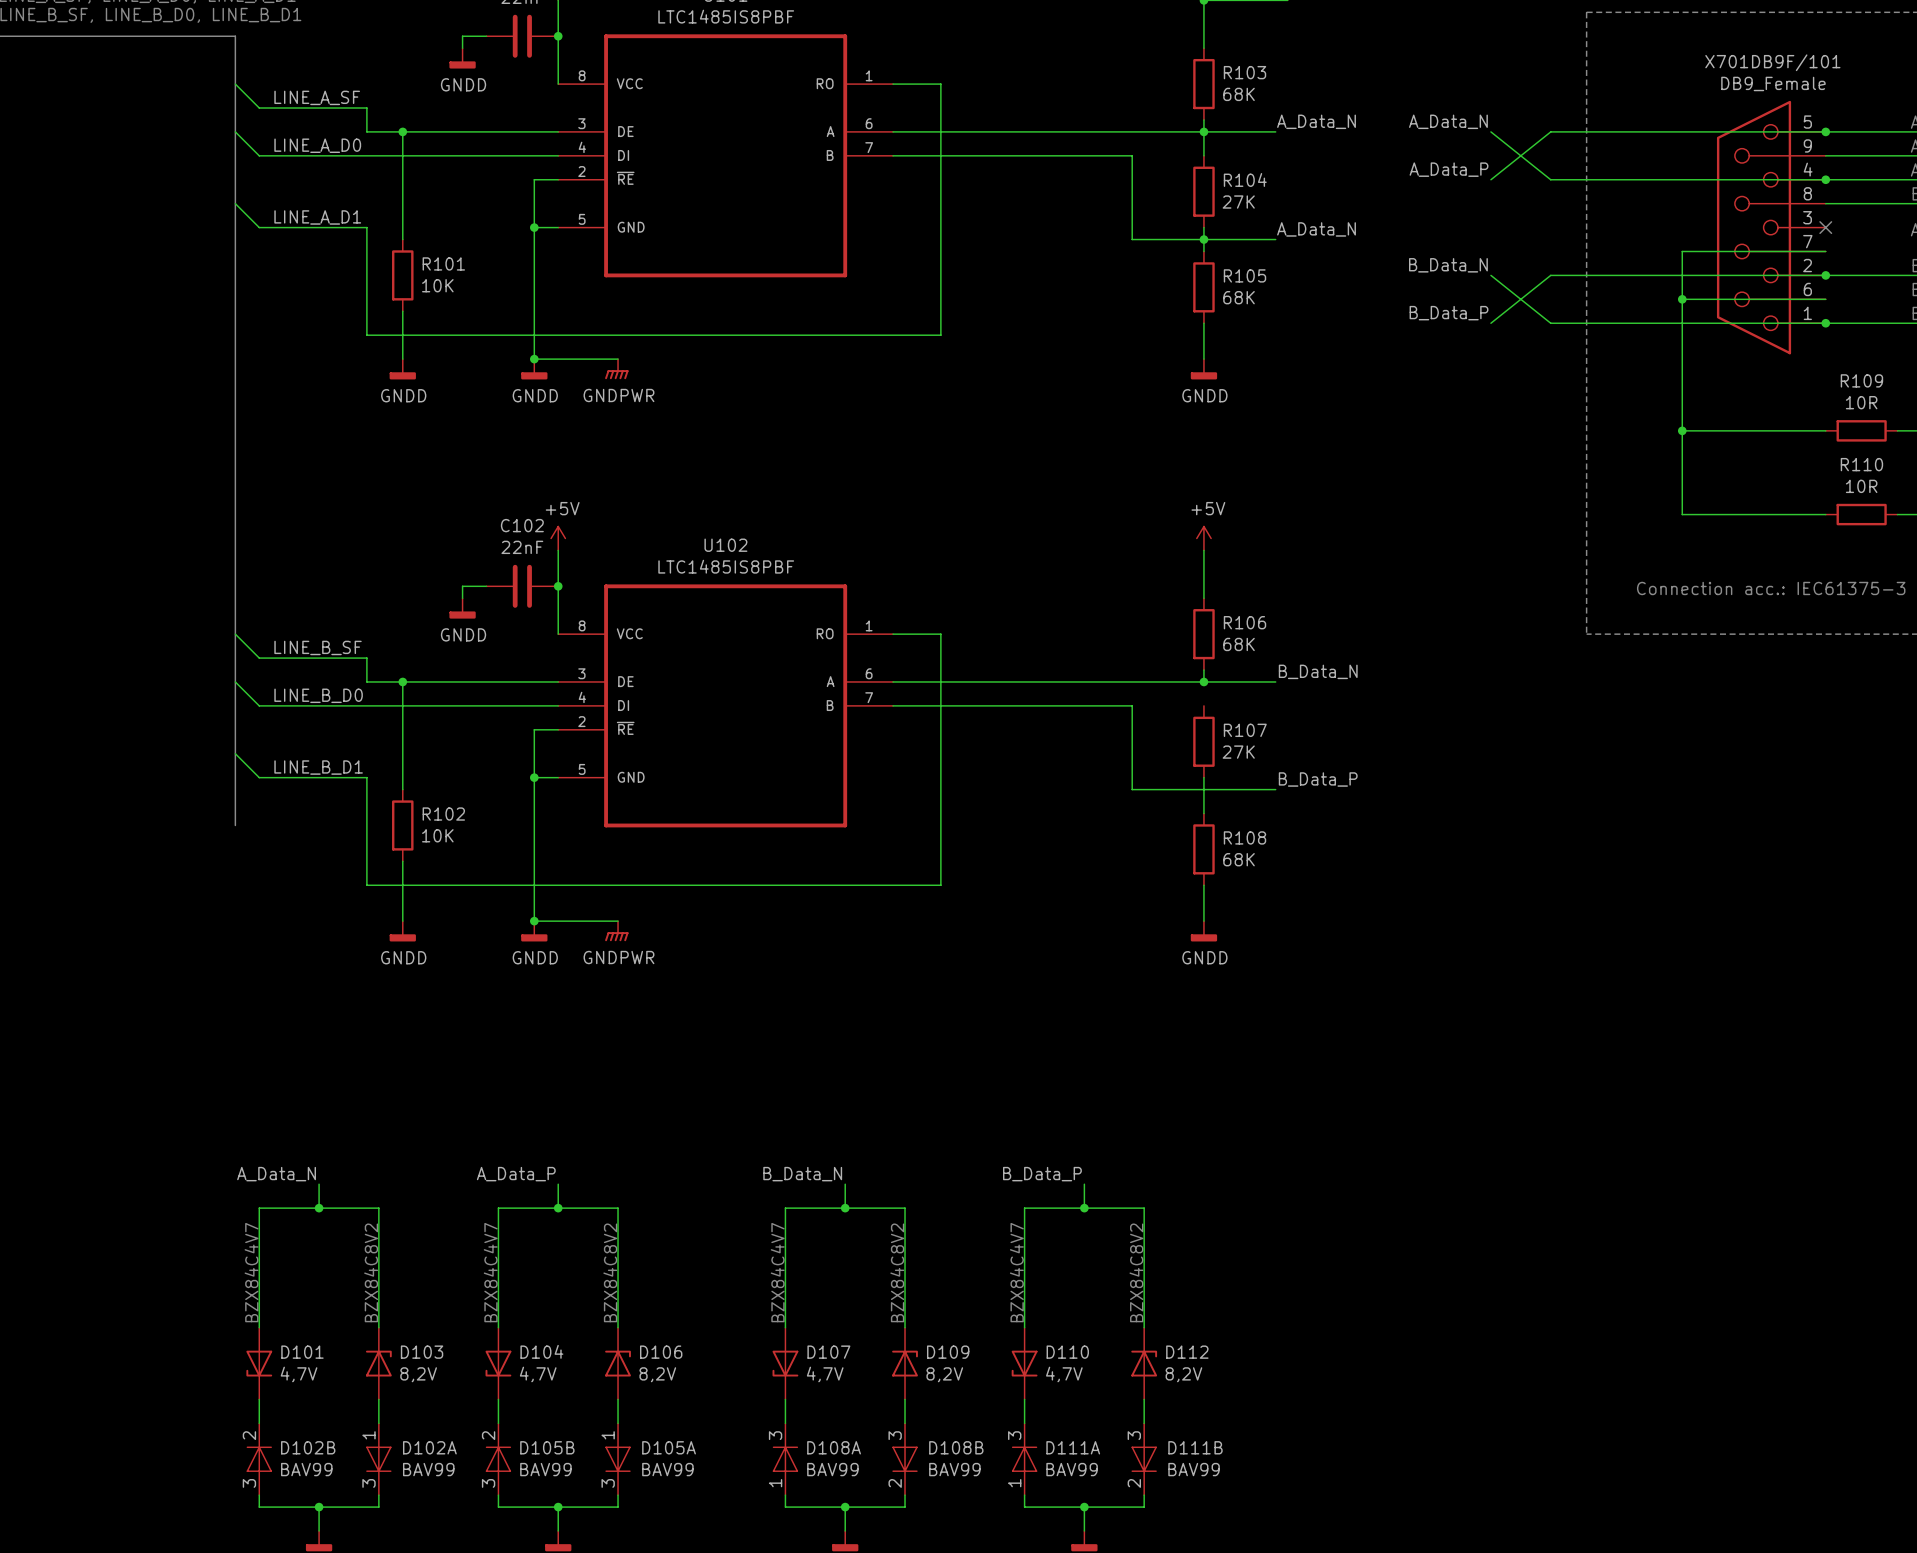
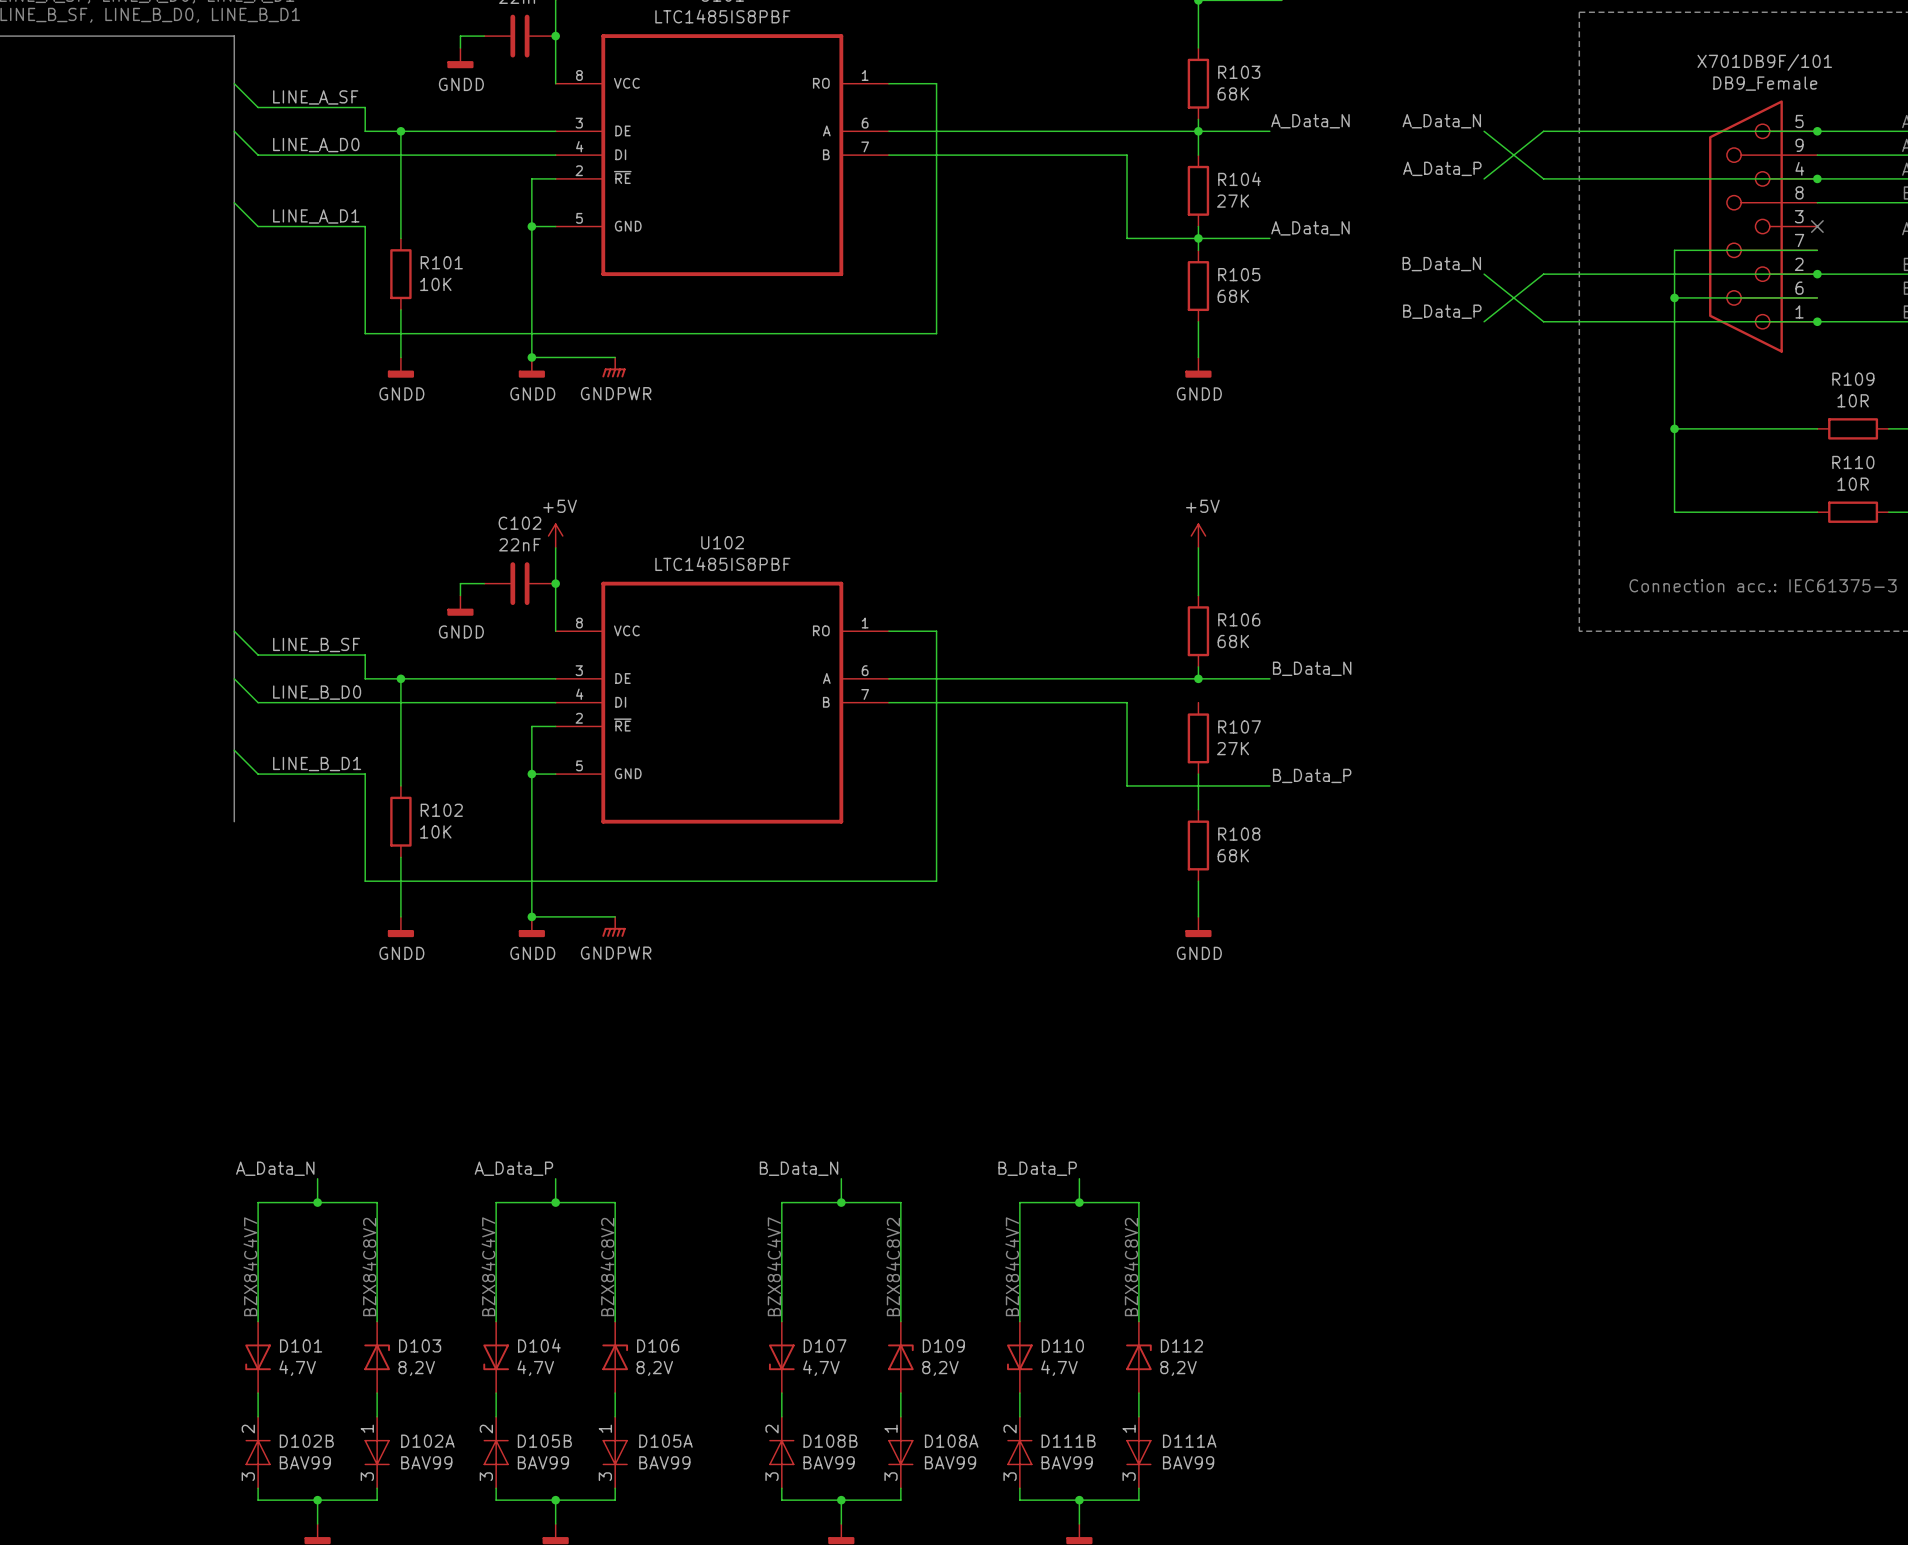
D108A rotation: 0° (785, 1458) -> 180° (900, 1452)
D111A rotation: 0° (1024, 1458) -> 180° (1138, 1452)
D108A position: (785, 1459) -> (900, 1452)
D108B rotation: 0° (905, 1459) -> 180° (781, 1452)
D108B position: (905, 1459) -> (781, 1452)
D111A position: (1024, 1459) -> (1138, 1452)
D111B rotation: 0° (1144, 1459) -> 180° (1019, 1452)
D111B position: (1144, 1459) -> (1019, 1452)

